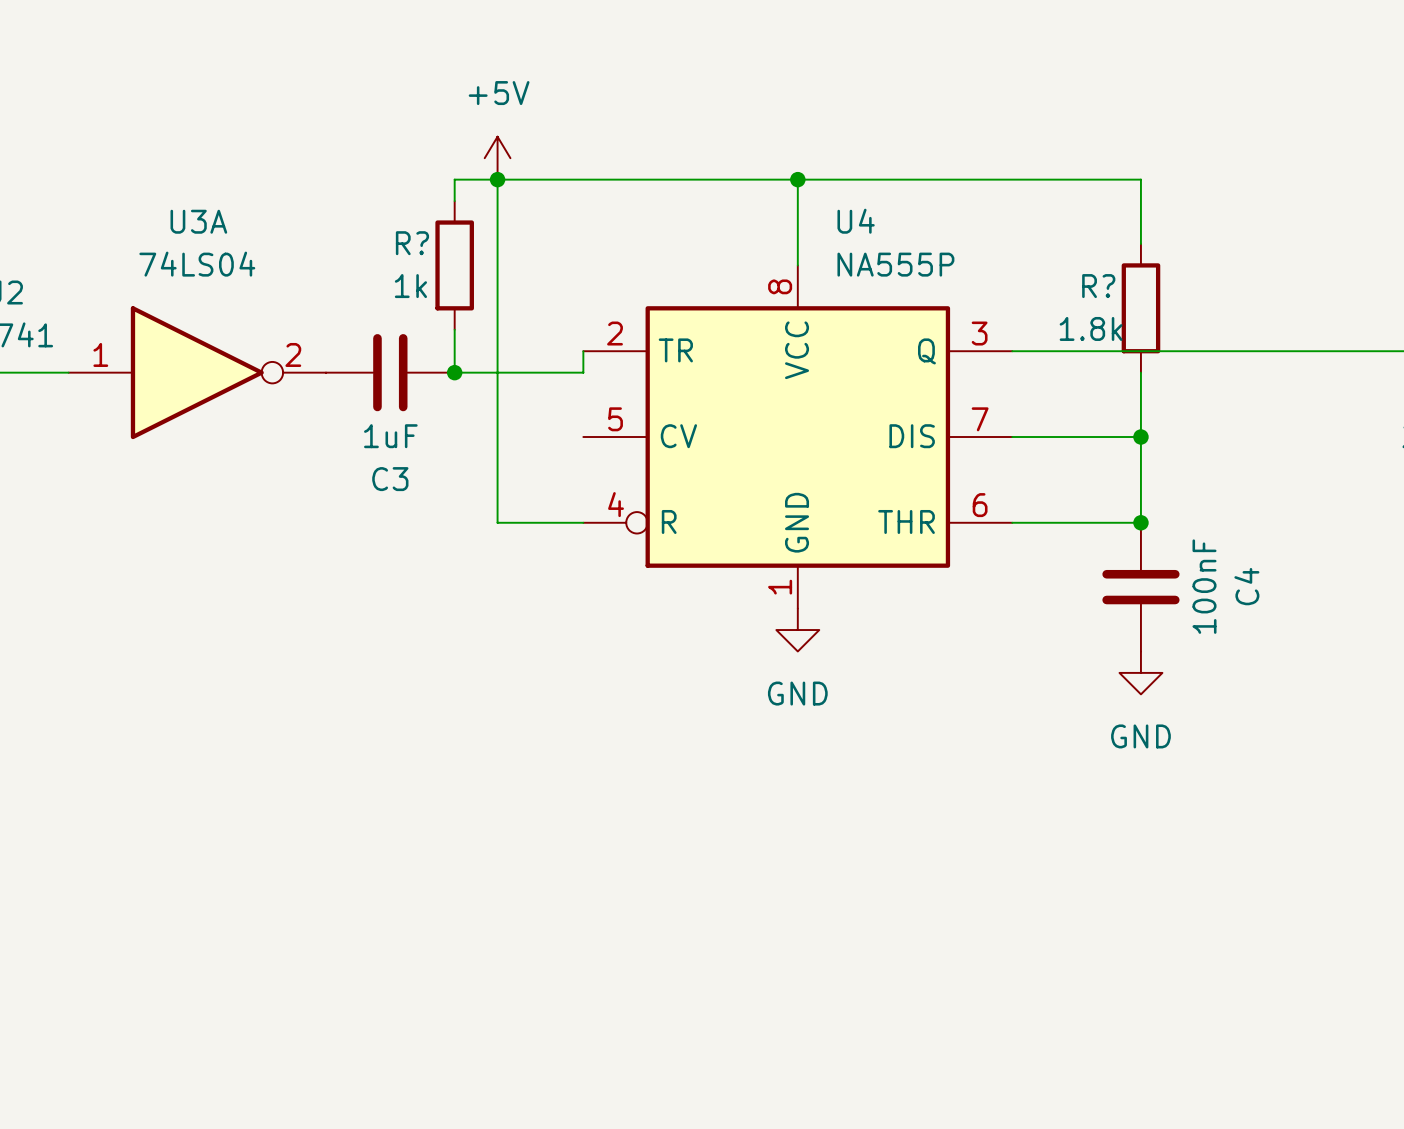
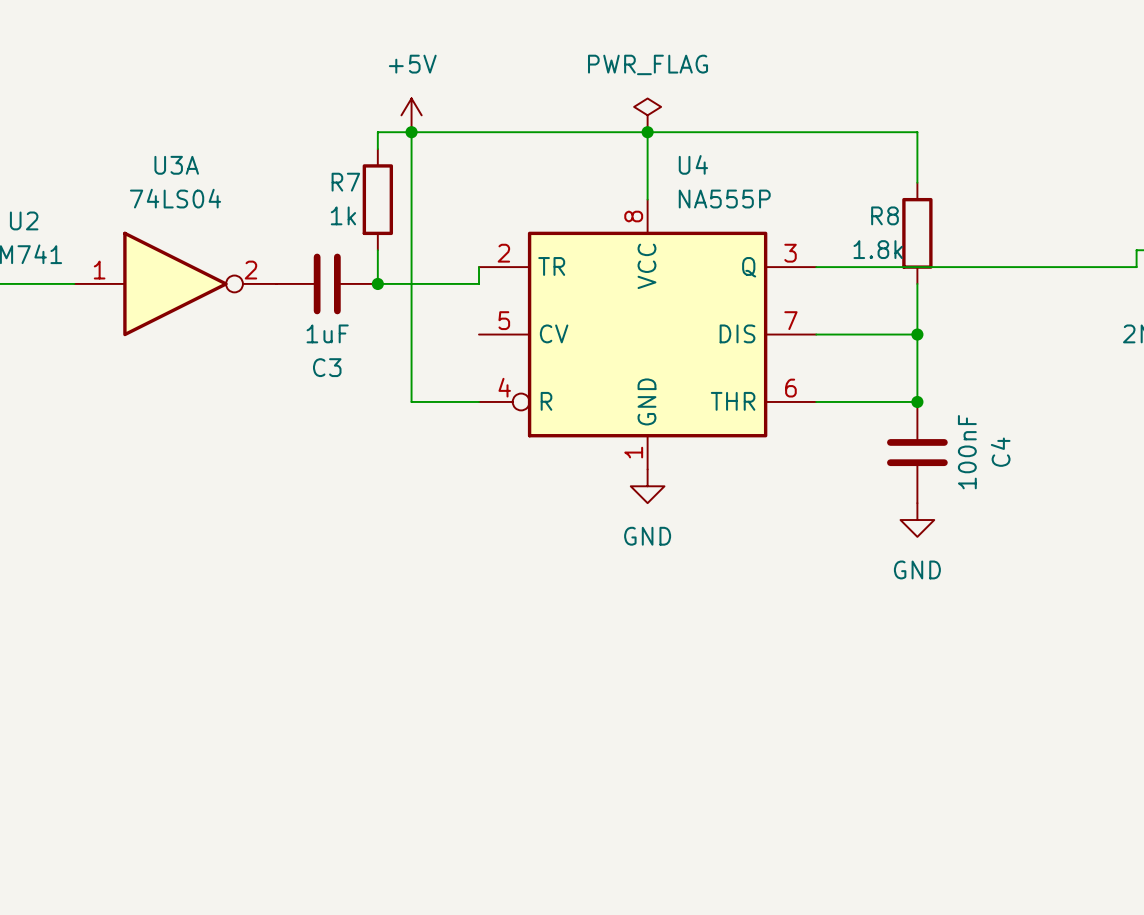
power symbol: none -> PWR_FLAG (647, 115)
R? name: R? (412, 243) -> R7 (345, 182)
R? name: R? (1098, 286) -> R8 (885, 215)

